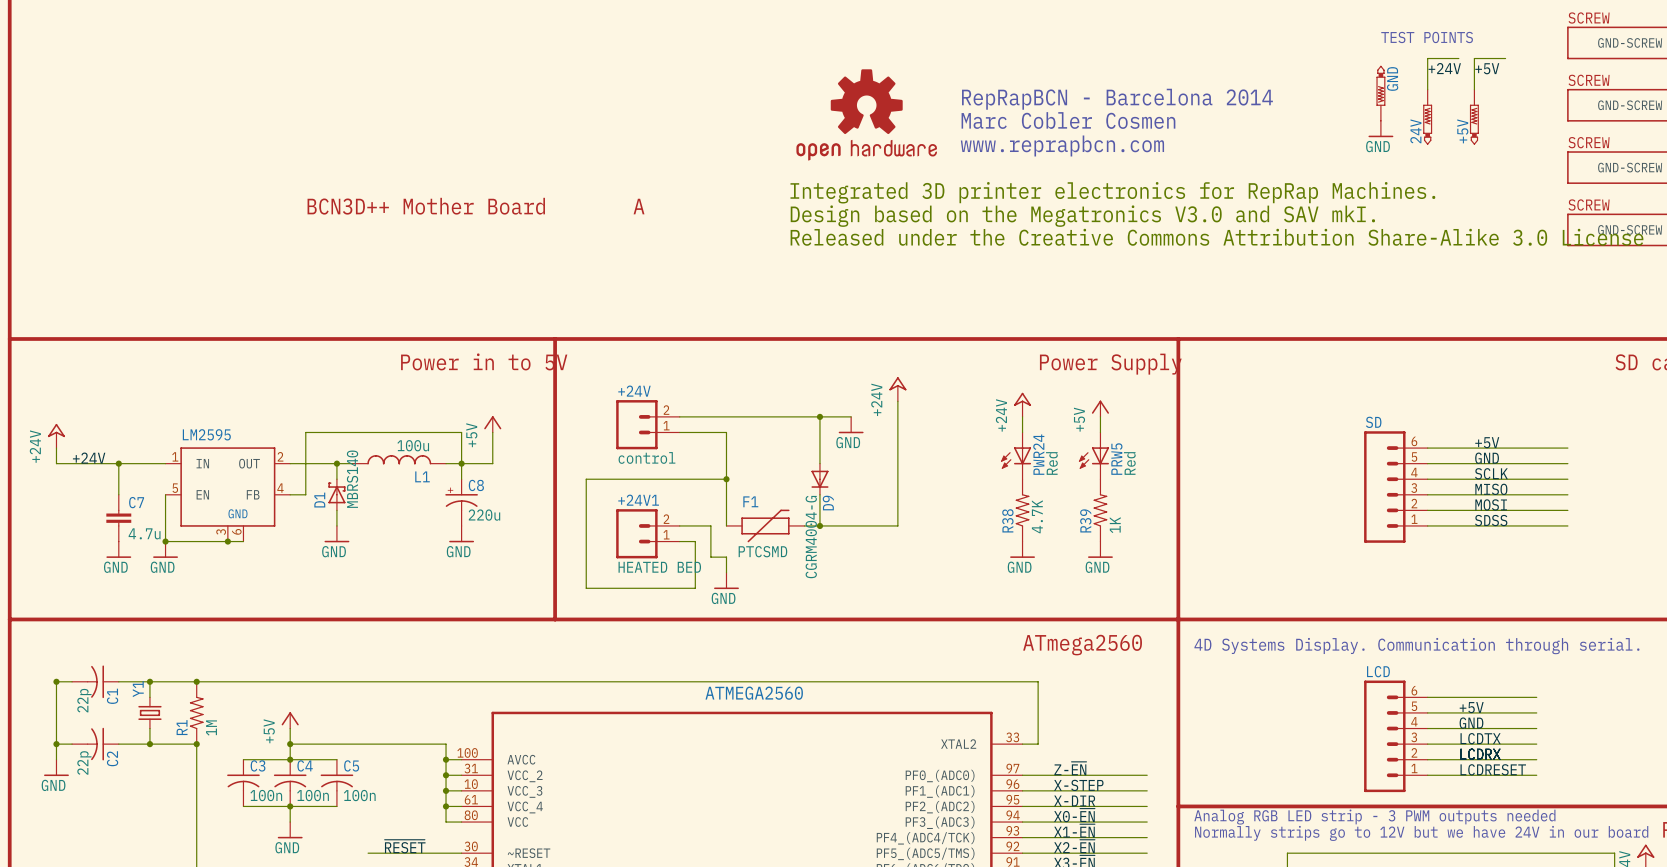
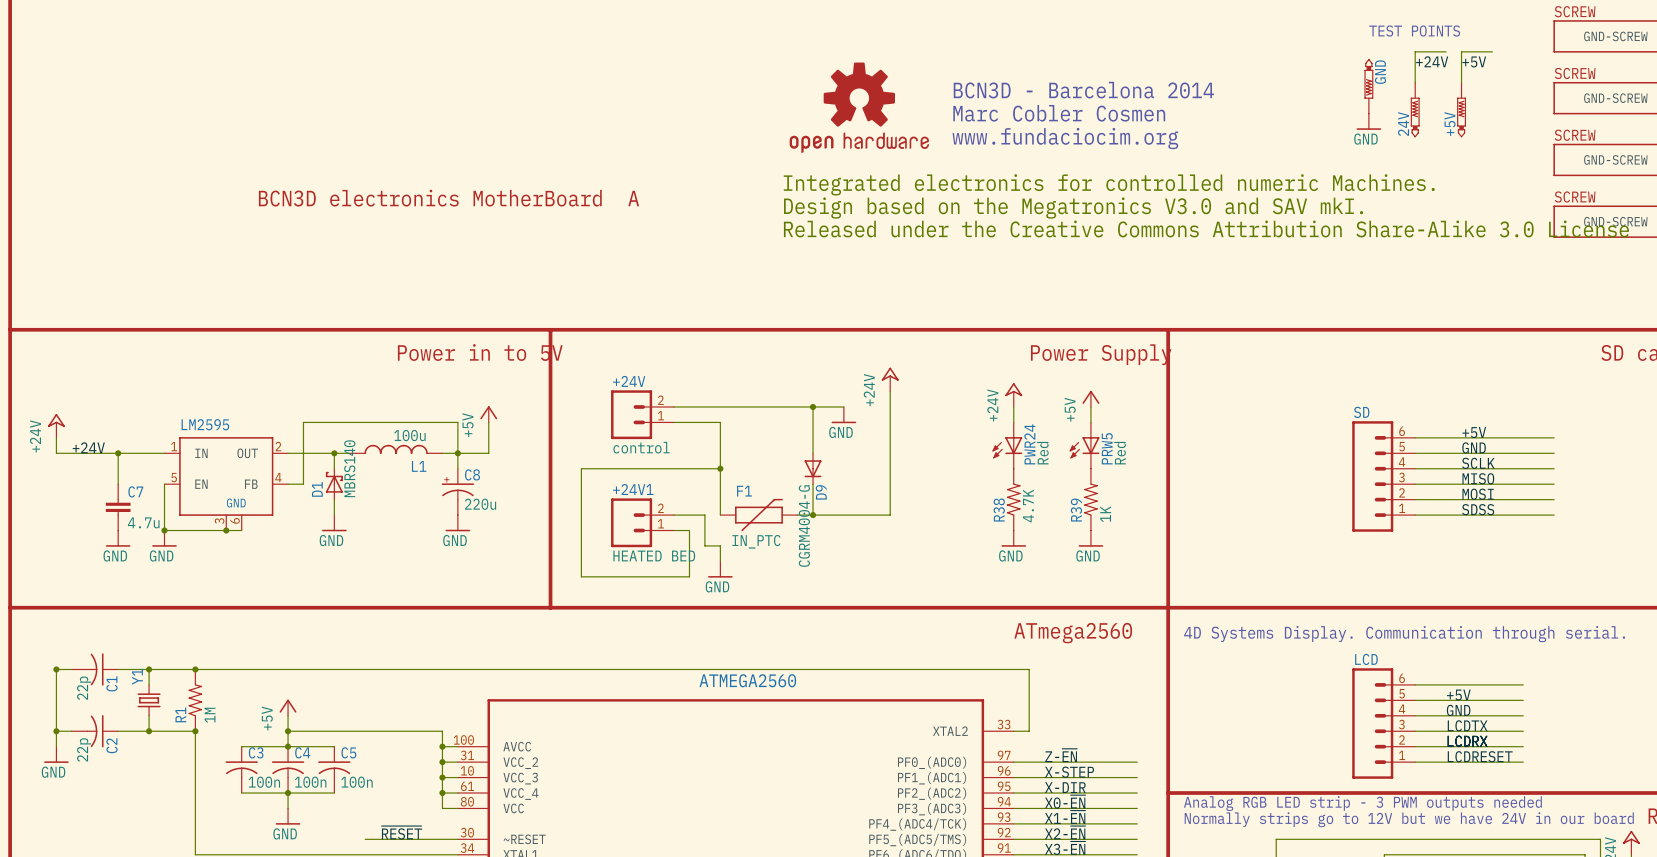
text: RepRapBCN - Barcelona 2014 (1117, 99) -> BCN3D - Barcelona 2014 (1083, 90)
text: www.reprapbcn.com (1062, 145) -> www.fundaciocim.org (1065, 138)
text: Integrated 3D printer electronics for RepRap Machines. (1112, 192) -> Integrated electronics for controlled numeric Machines. (1109, 184)
text: BCN3D++ Mother Board (426, 206) -> BCN3D electronics MotherBoard (430, 198)
F1 value: PTCSMD (762, 551) -> IN_PTC (756, 541)

